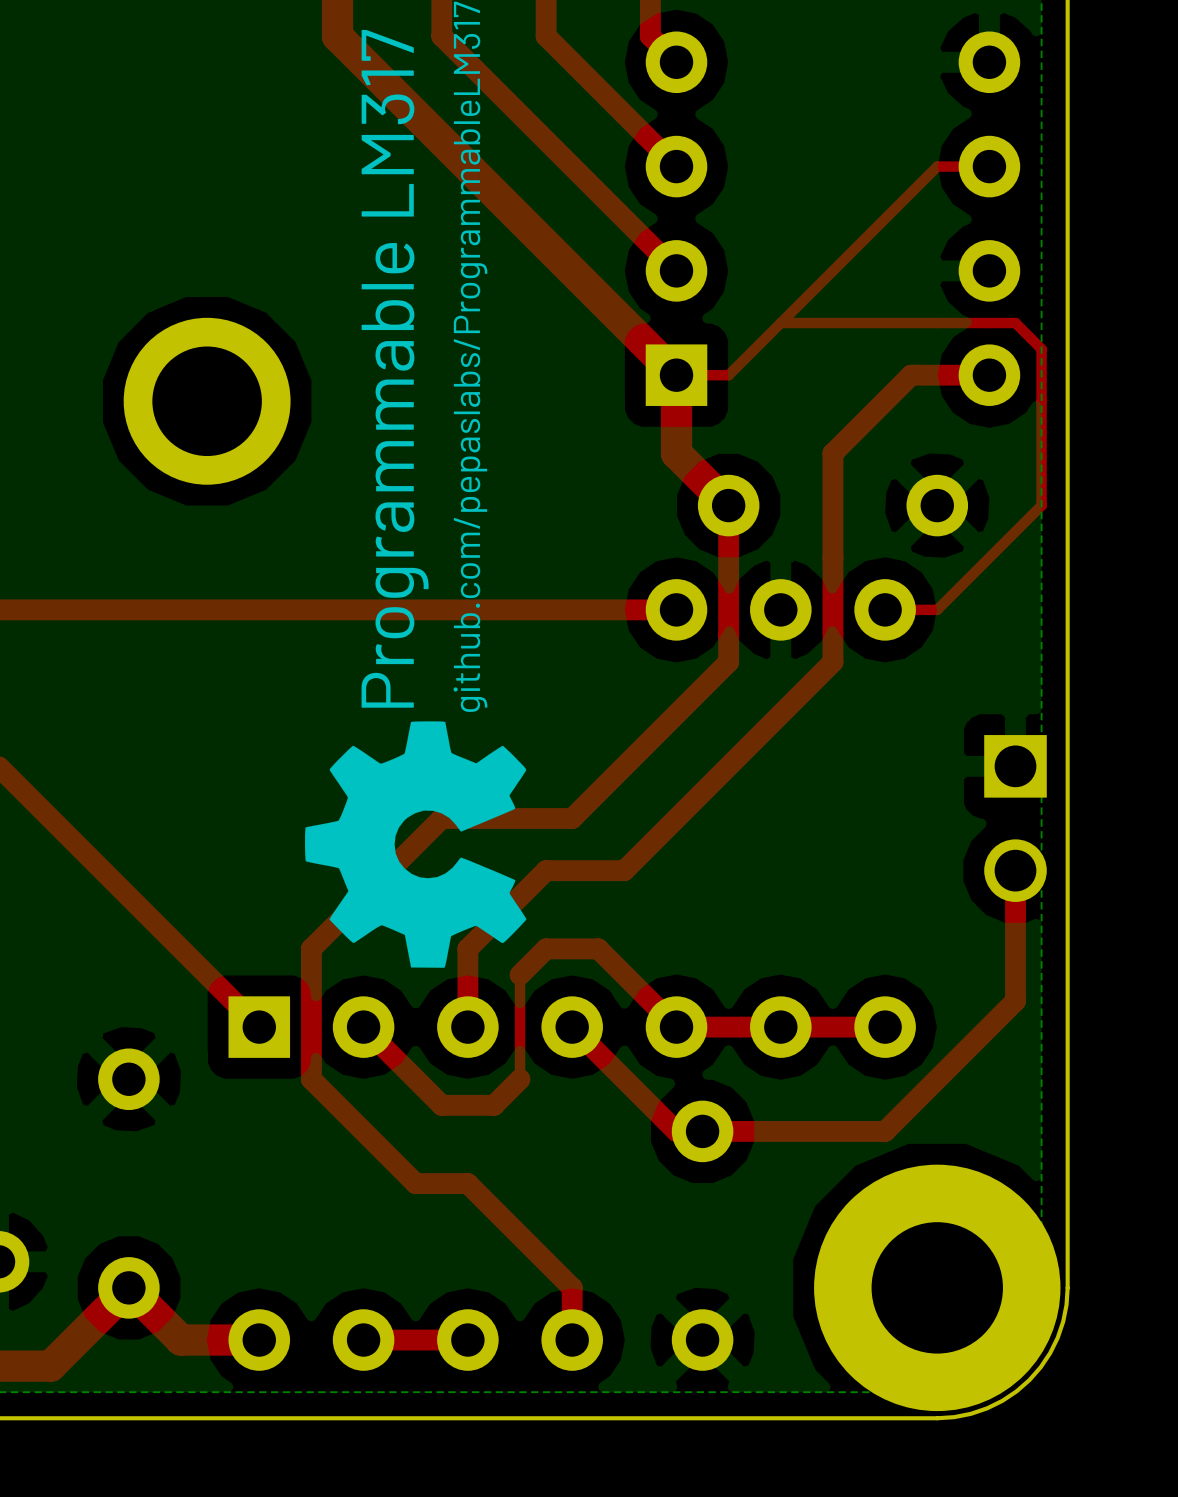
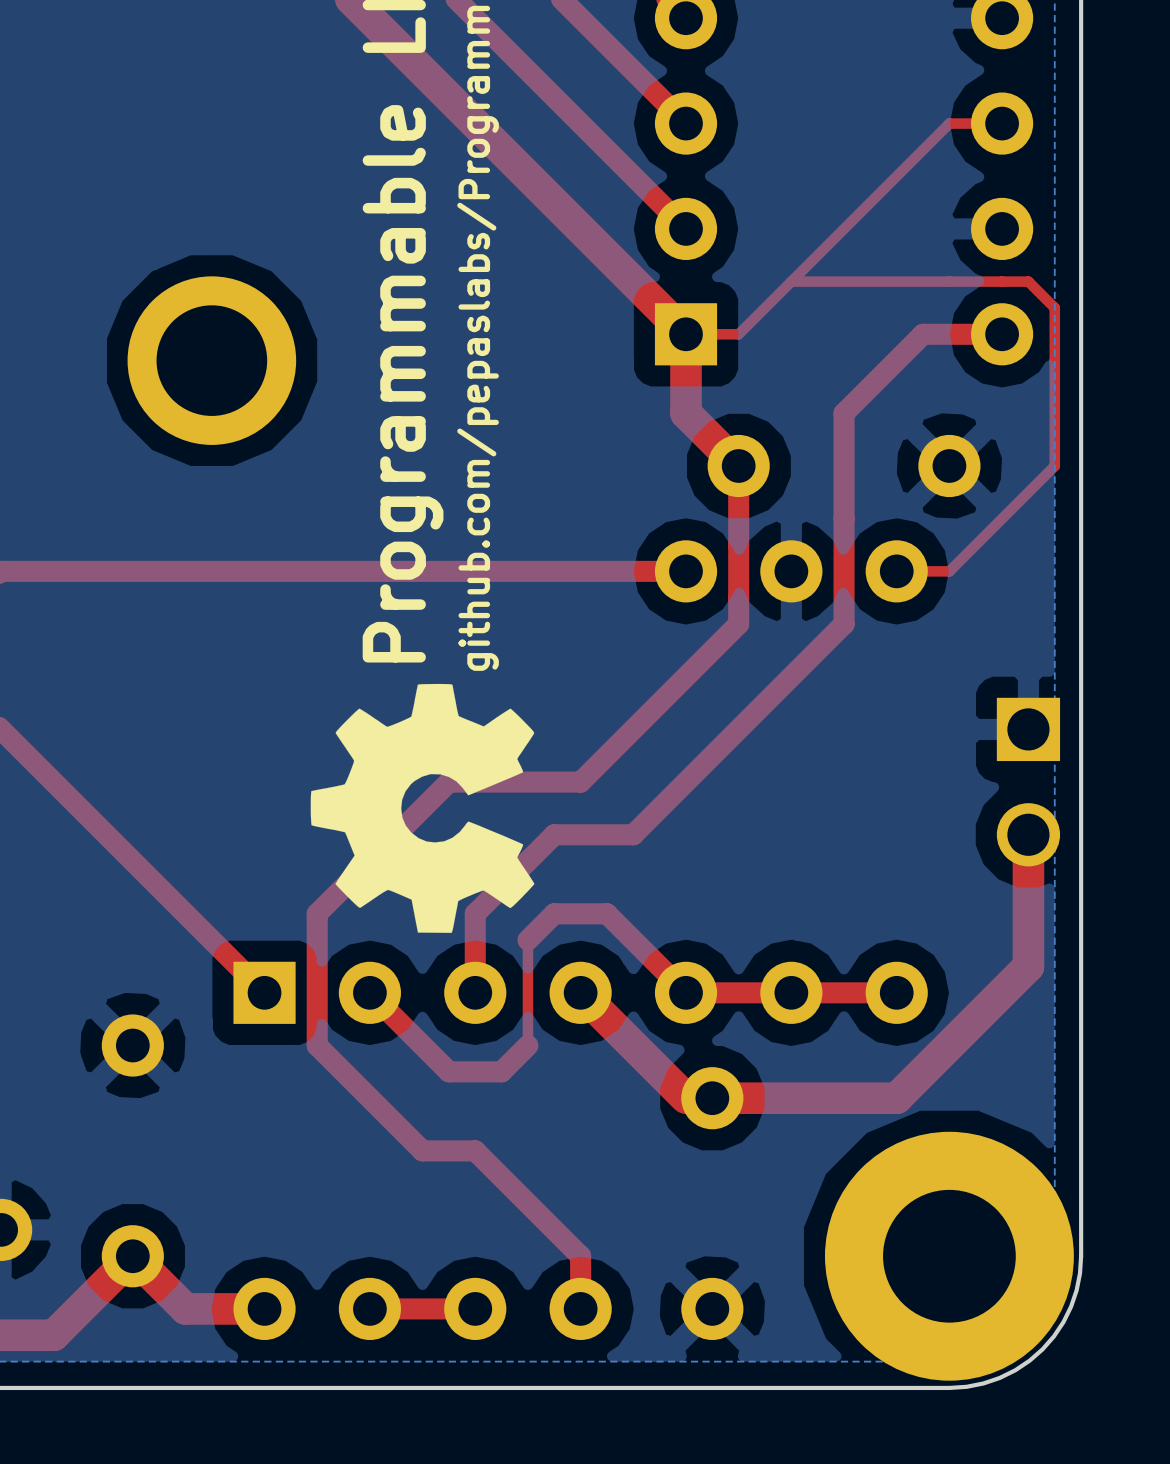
top track width: thin (1015, 870) (1015, 1001) (885, 1131) (702, 1131) -> thick (1028, 834) (1028, 966) (896, 1098) (712, 1098)
top track width: thin (572, 1027) (676, 1131) -> thick (580, 992) (686, 1098)

